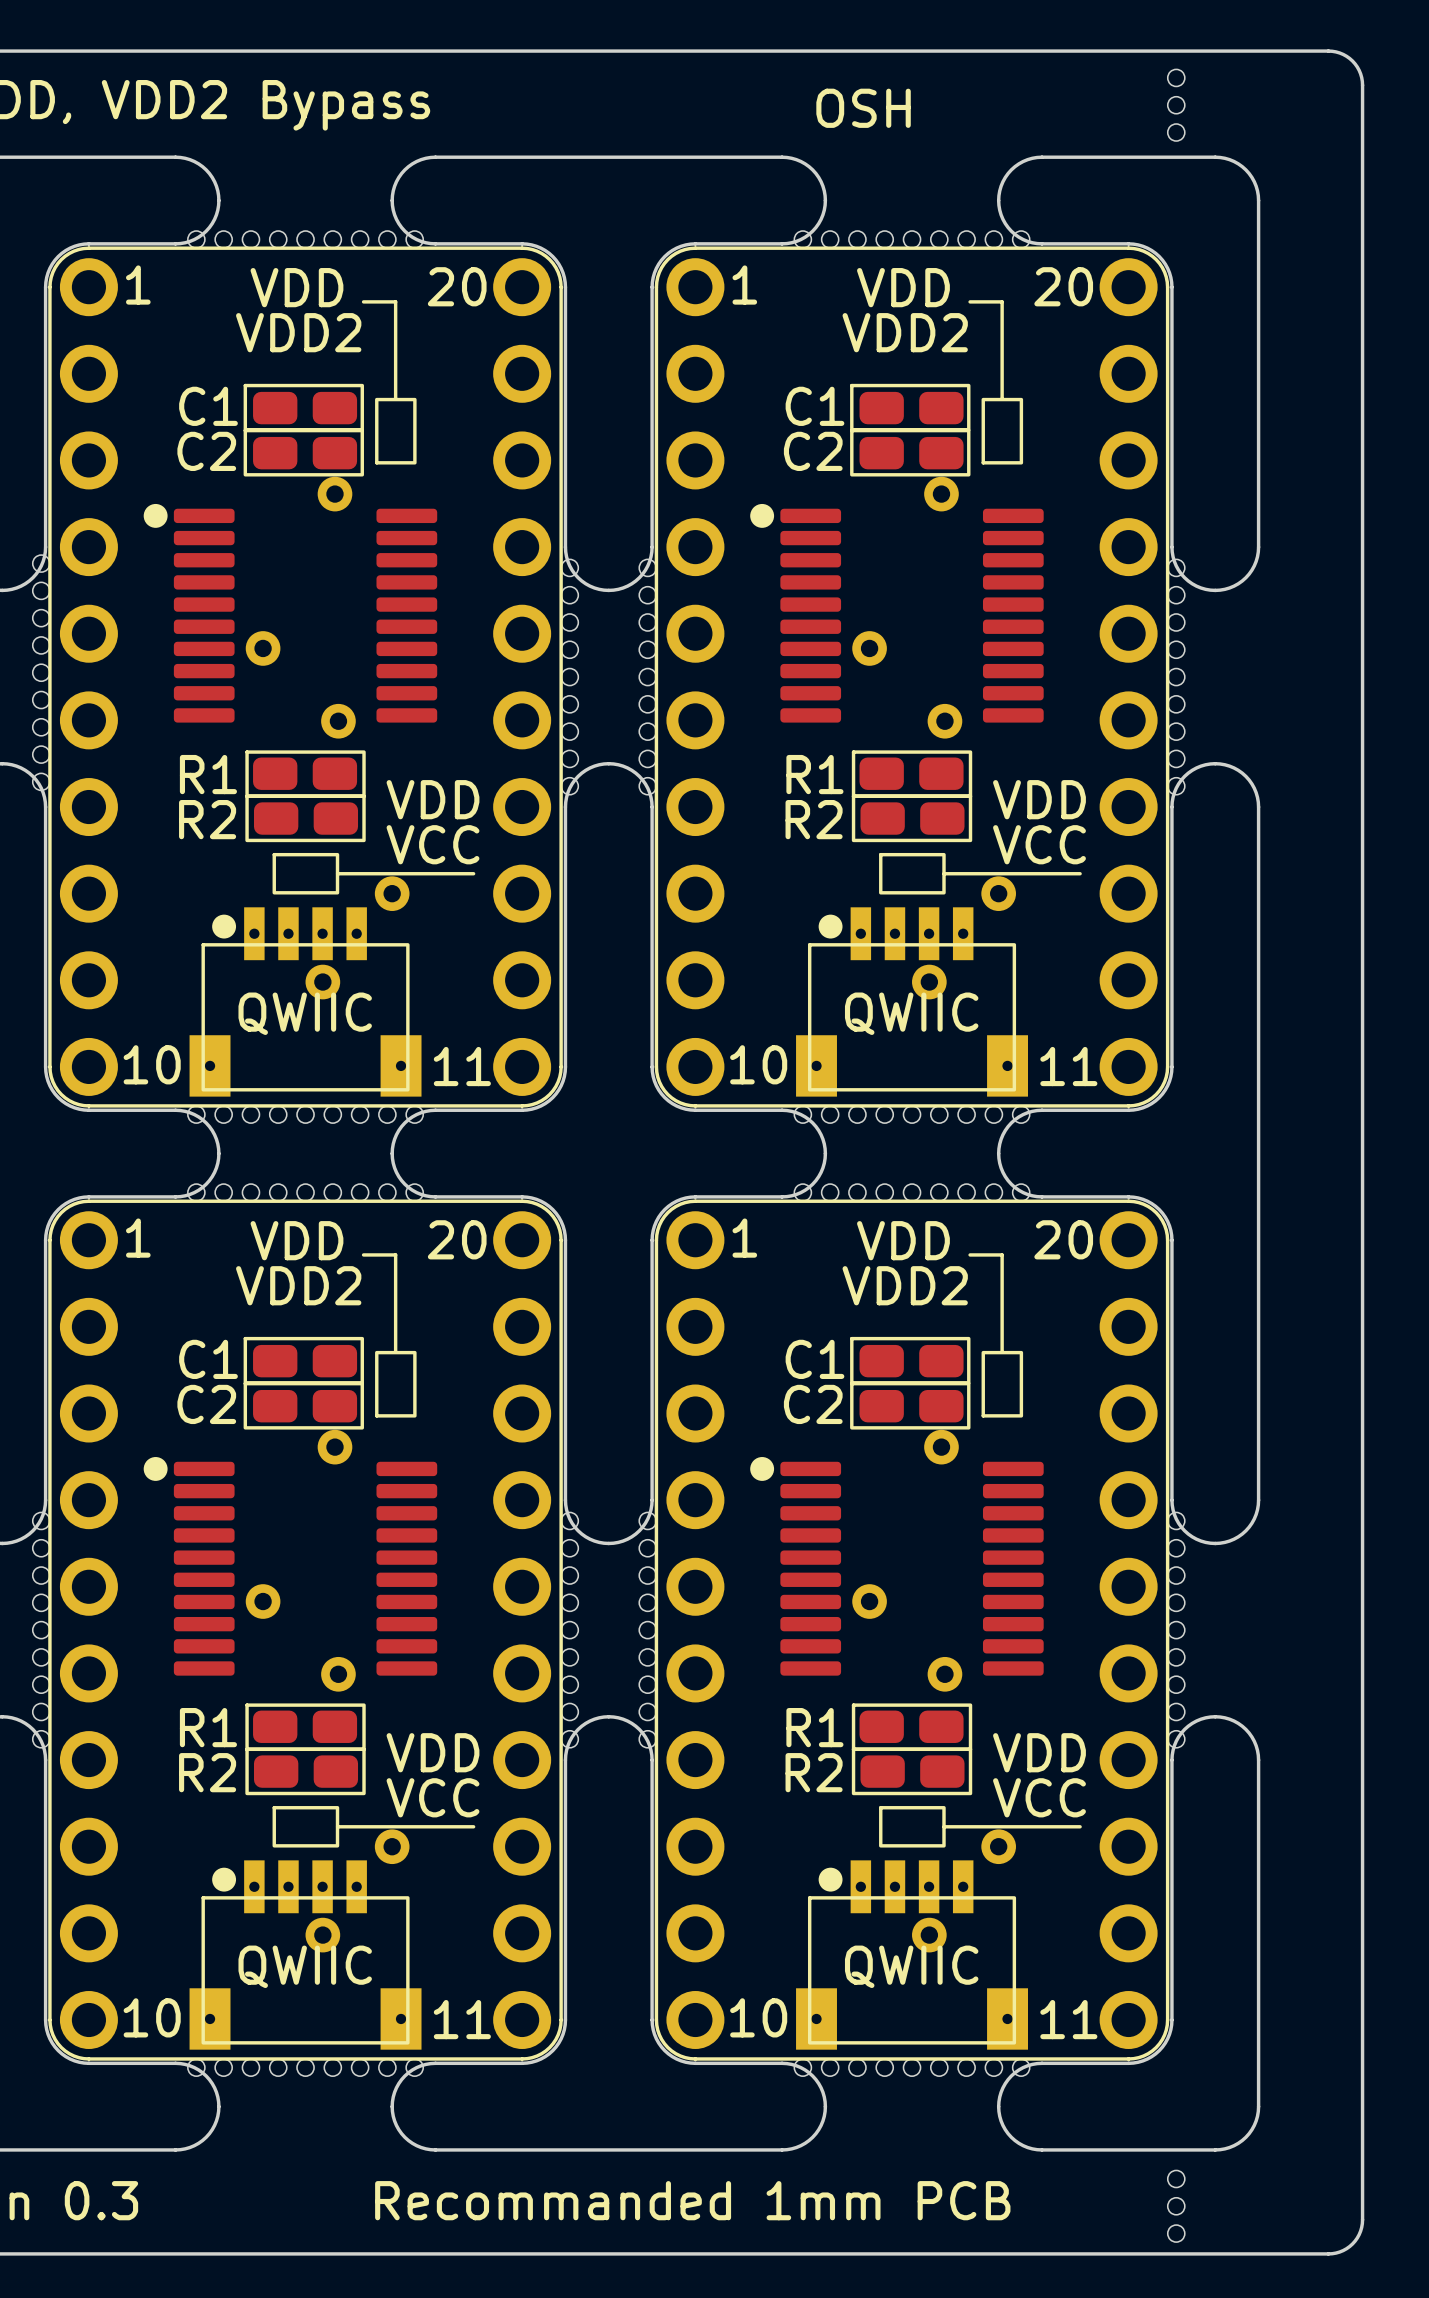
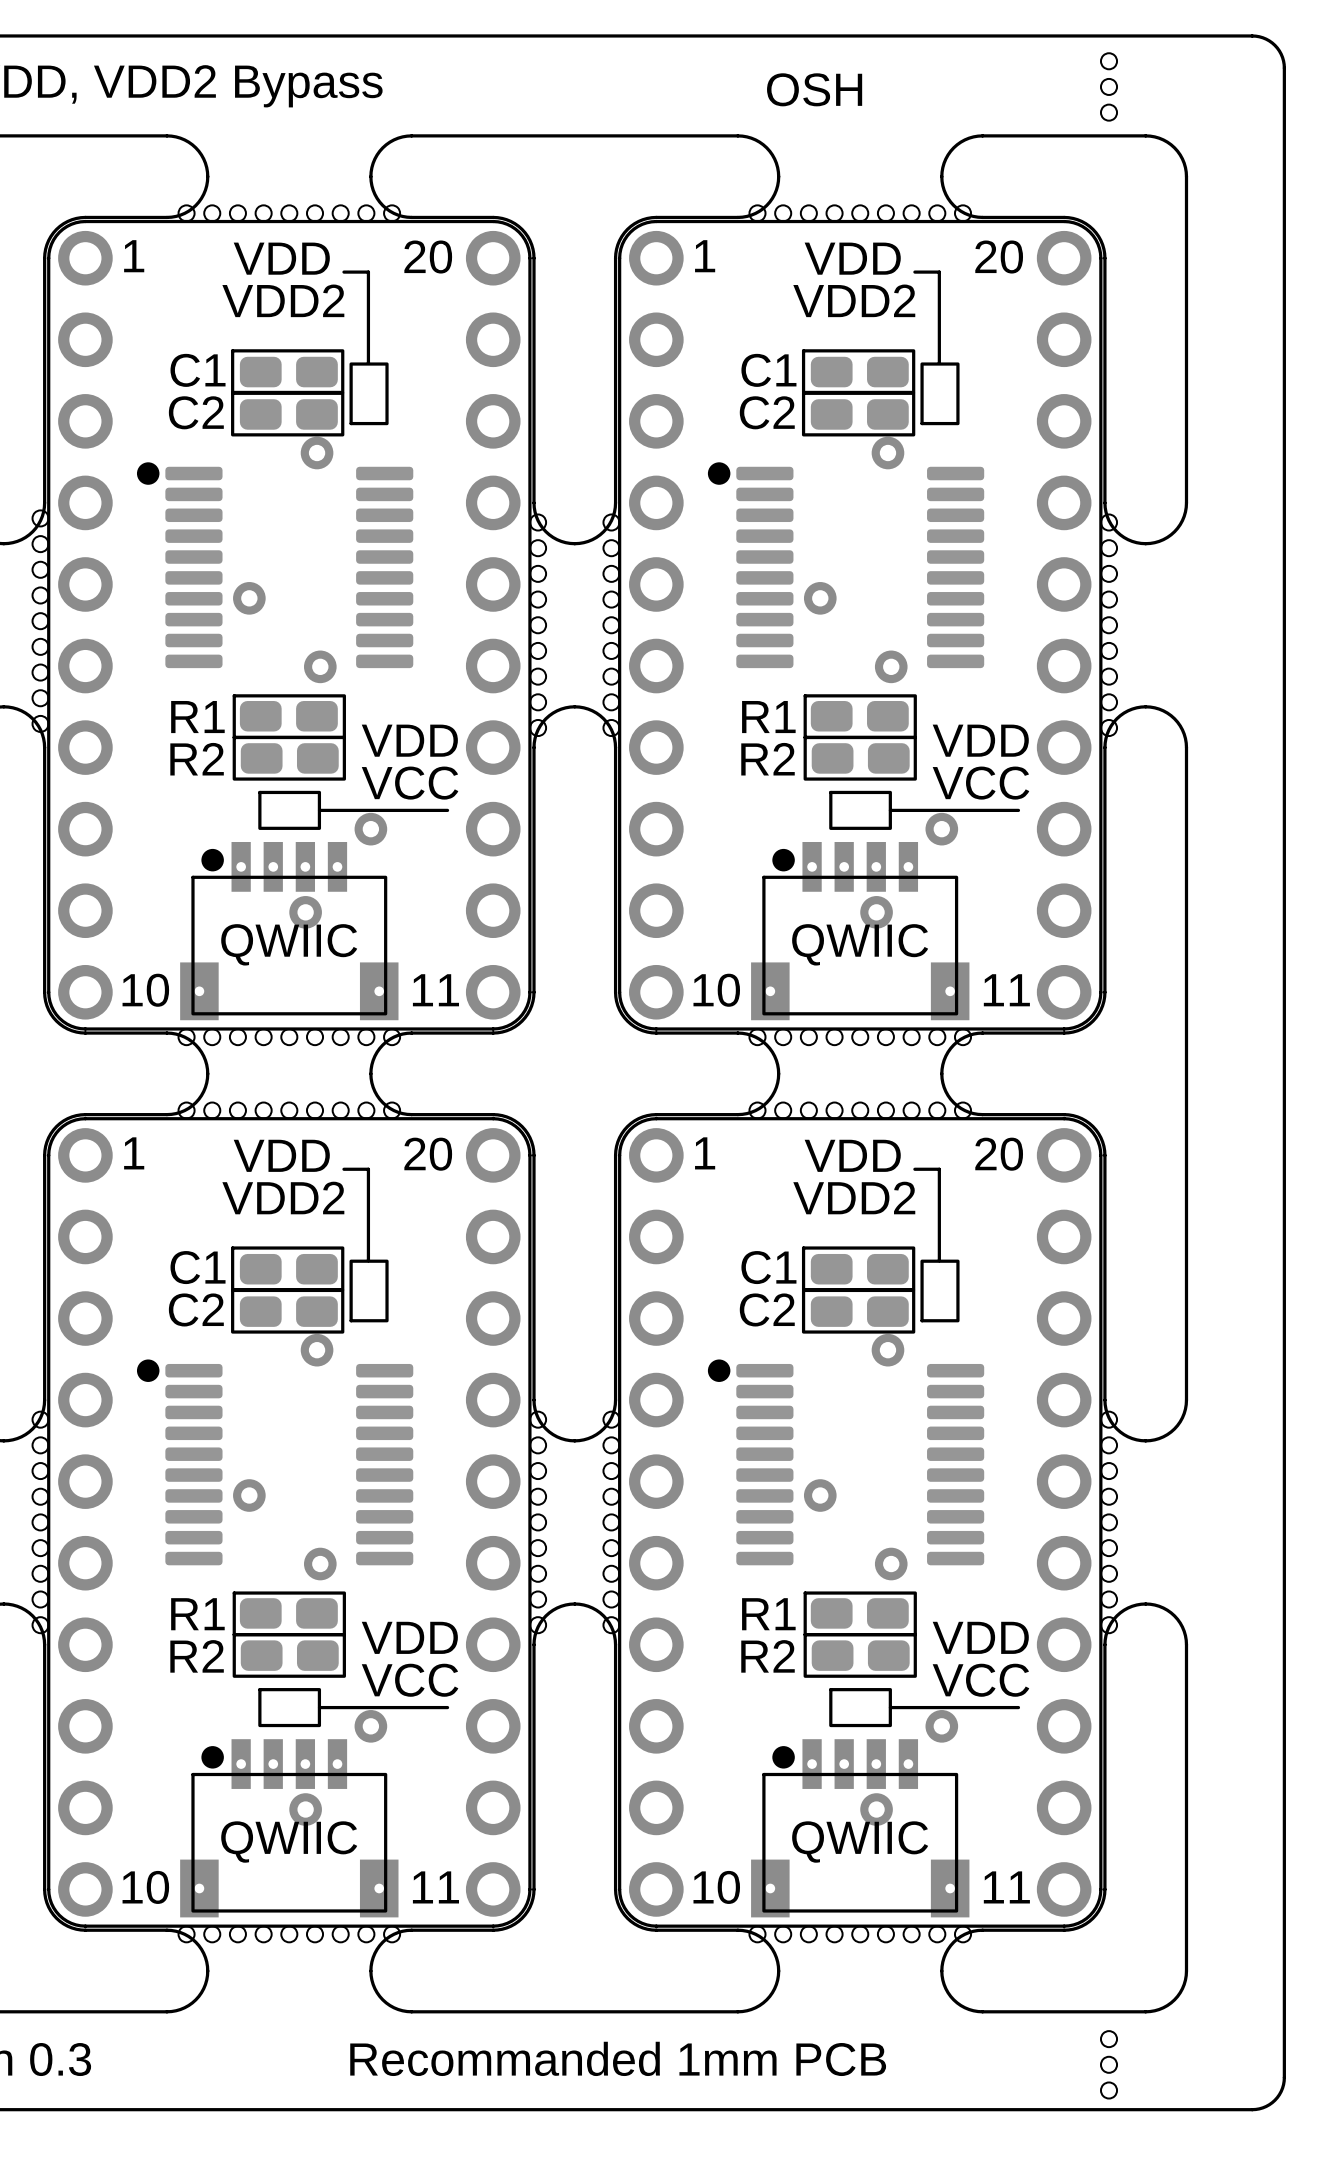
part footprint: [48, 246, 563, 1108] -> [47, 219, 532, 1031]
part footprint: [654, 246, 1170, 1108] -> [618, 219, 1103, 1031]
part footprint: [48, 1199, 563, 2061] -> [47, 1117, 532, 1928]
part footprint: [654, 1199, 1170, 2061] -> [618, 1117, 1103, 1928]

